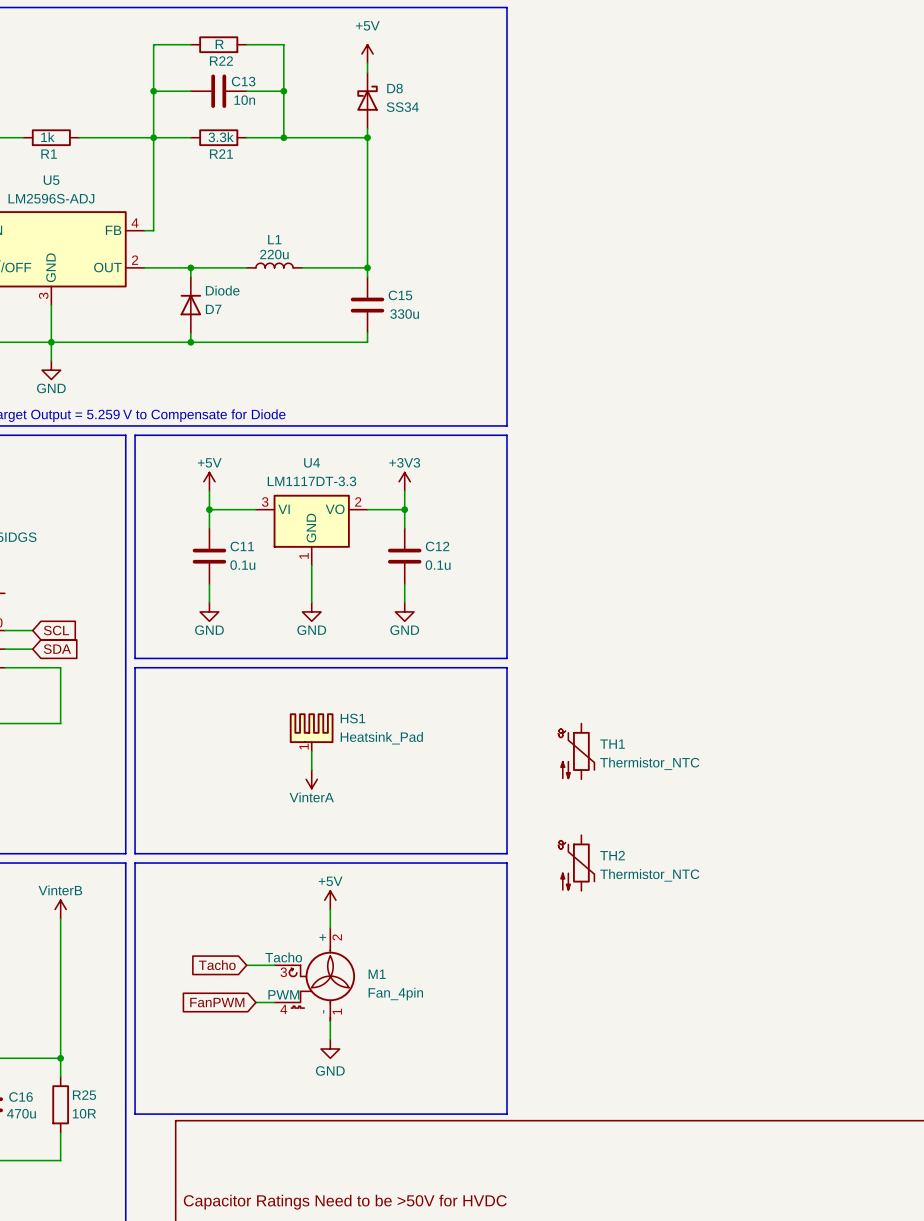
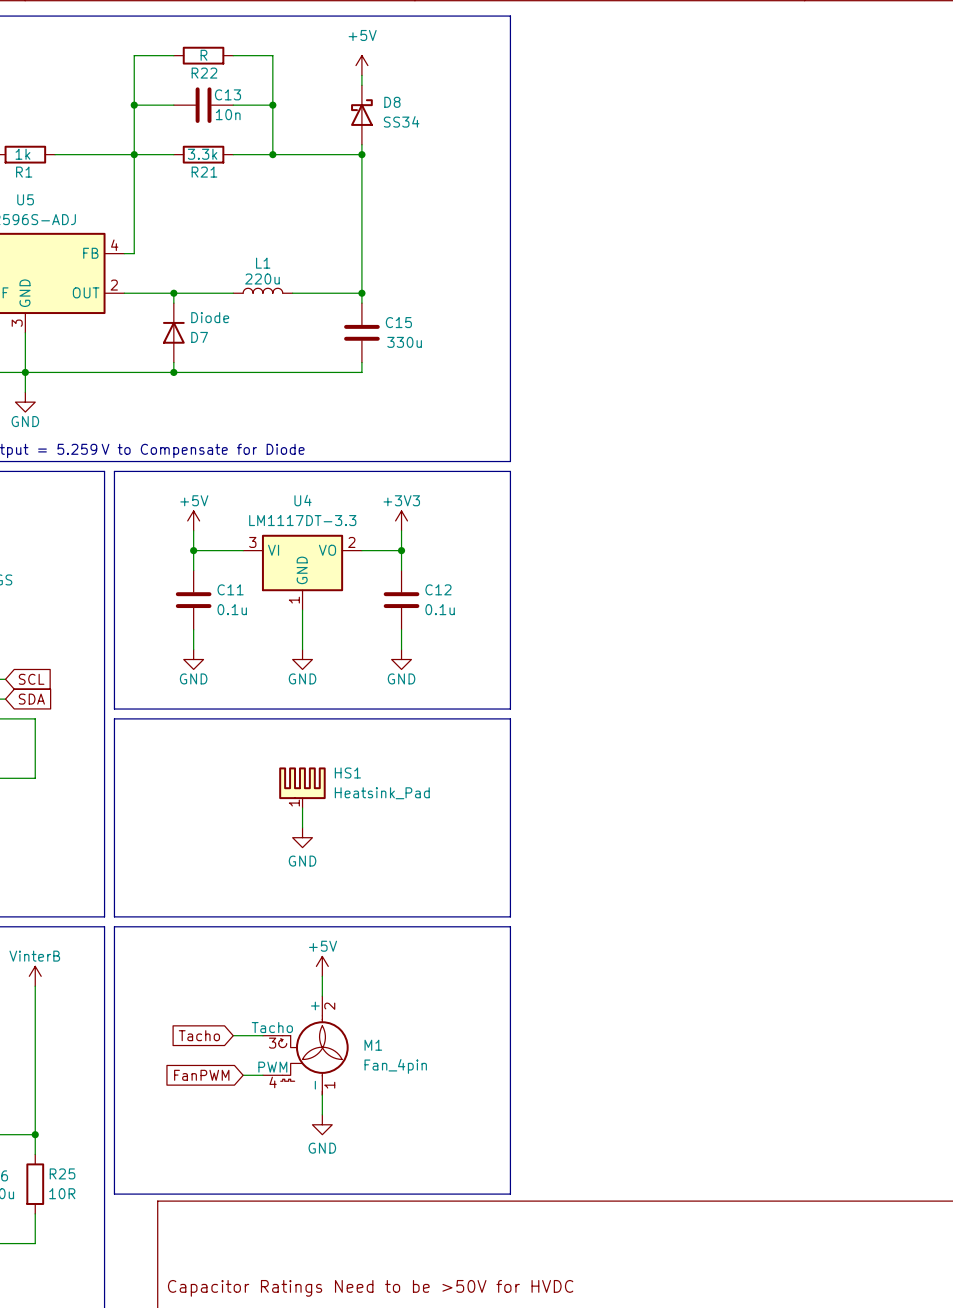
TH1: Thermistor_NTC (576, 751) -> none
power symbol: VinterA (311, 779) -> GND (302, 837)
TH2: Thermistor_NTC (576, 863) -> none

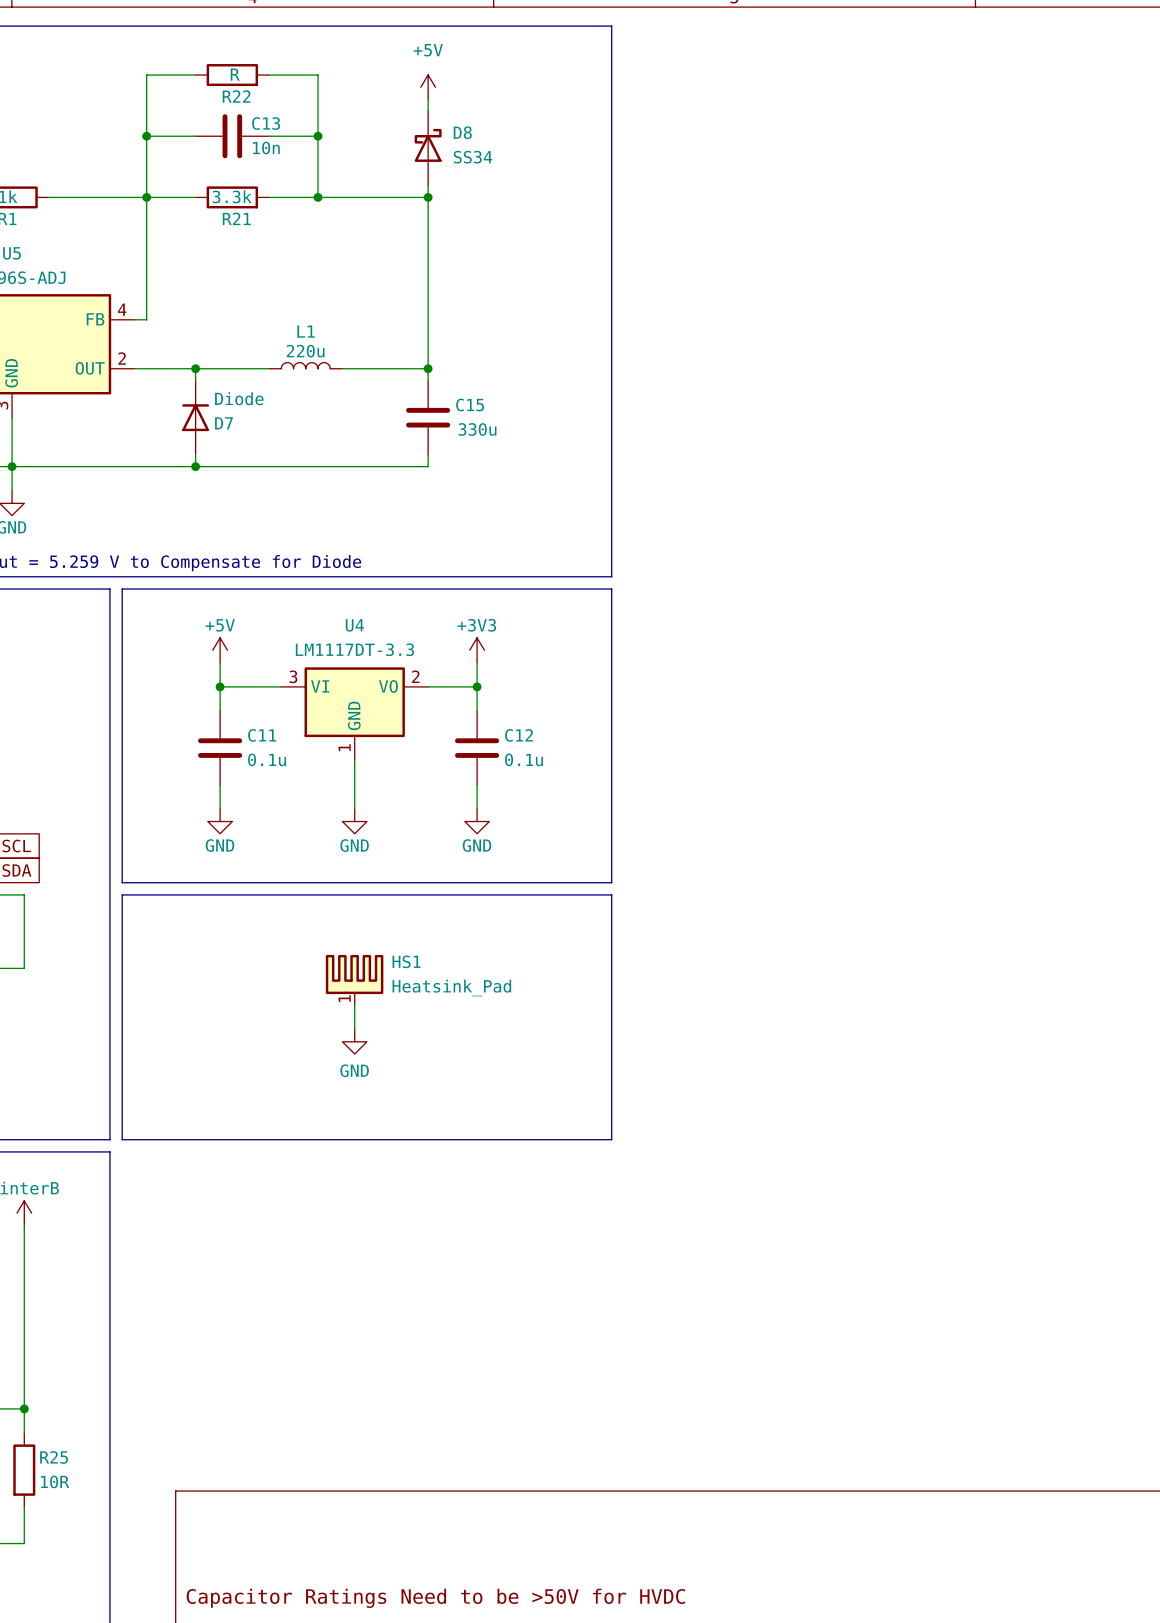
line: (114, 926) (510, 926) (510, 1194) (114, 1194) (114, 926) -> none
power symbol: +5V (322, 966) -> none
wire: (322, 976) (322, 996) -> none
global label: Tacho (199, 1035) -> none
wire: (233, 1035) (262, 1035) -> none
M1: Fan_4pin (305, 1045) -> none
global label: FanPWM (201, 1075) -> none
wire: (243, 1075) (262, 1075) -> none
wire: (322, 1095) (322, 1114) -> none
power symbol: GND (322, 1124) -> none

